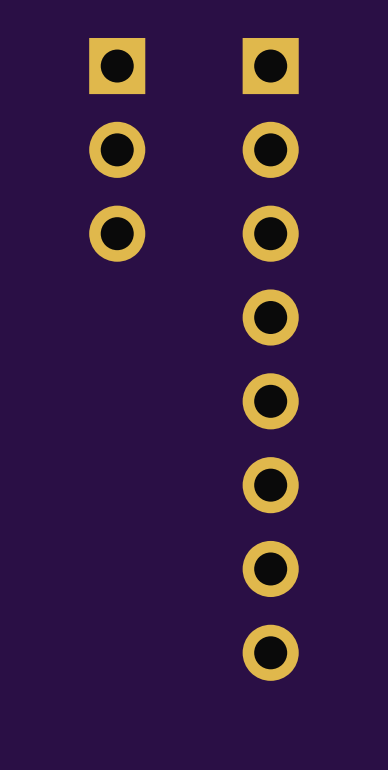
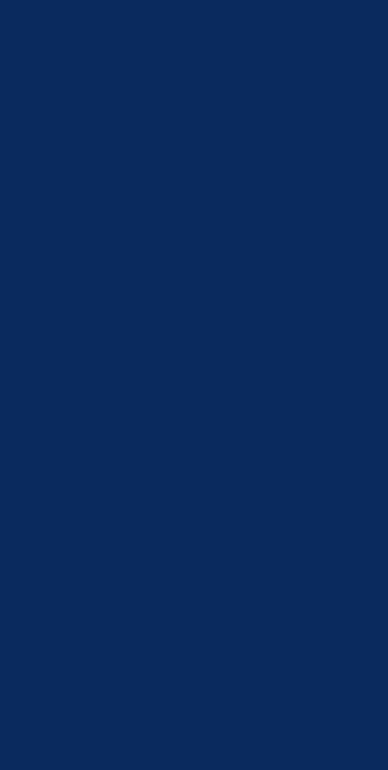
part: (117, 149) -> none
part: (270, 359) -> none

